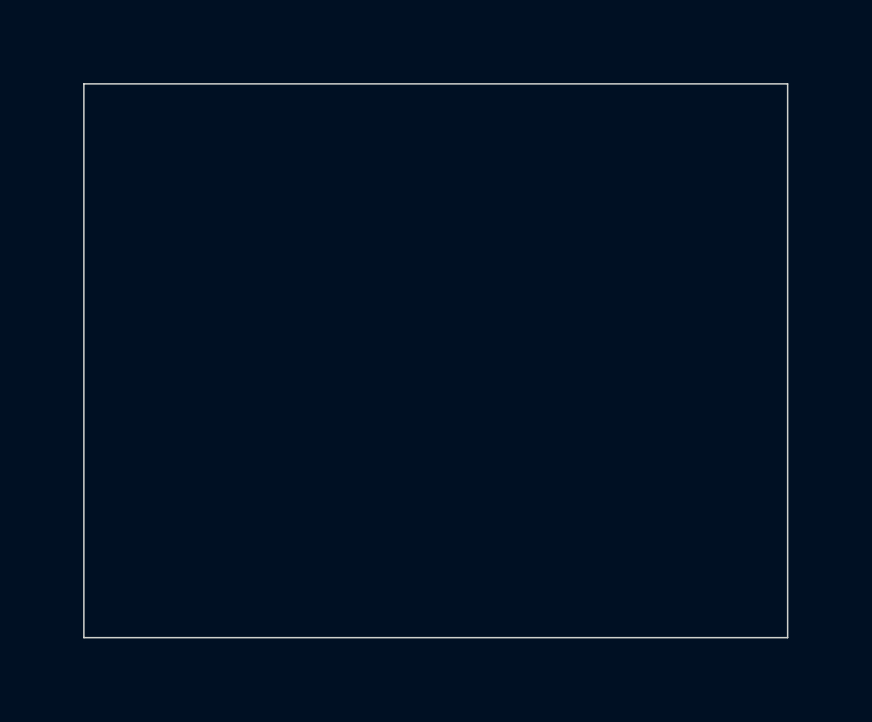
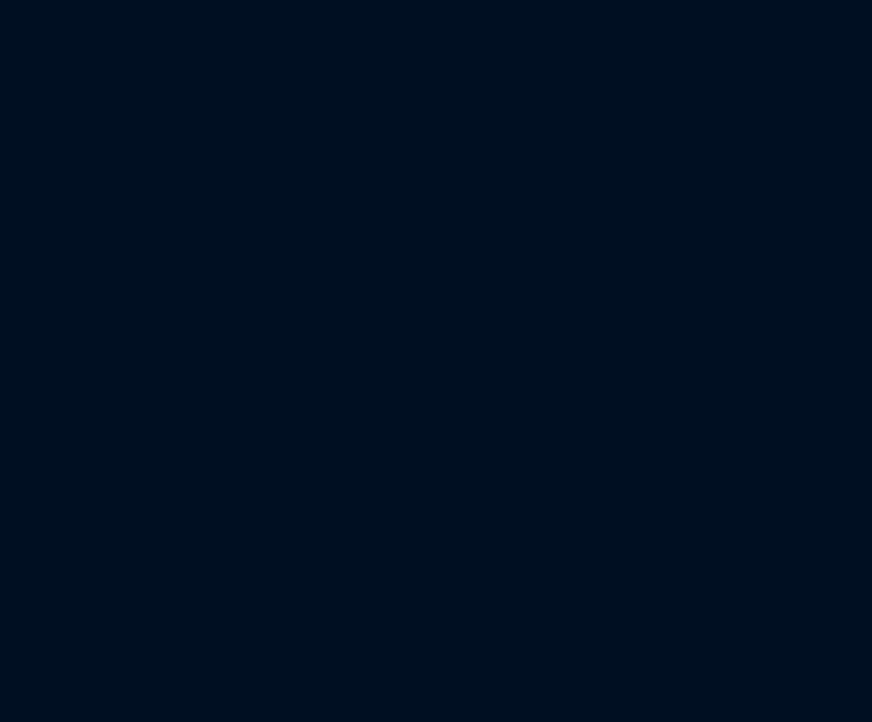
board edge: (83, 83) (787, 83) (787, 637) (83, 637) (83, 83) -> none

